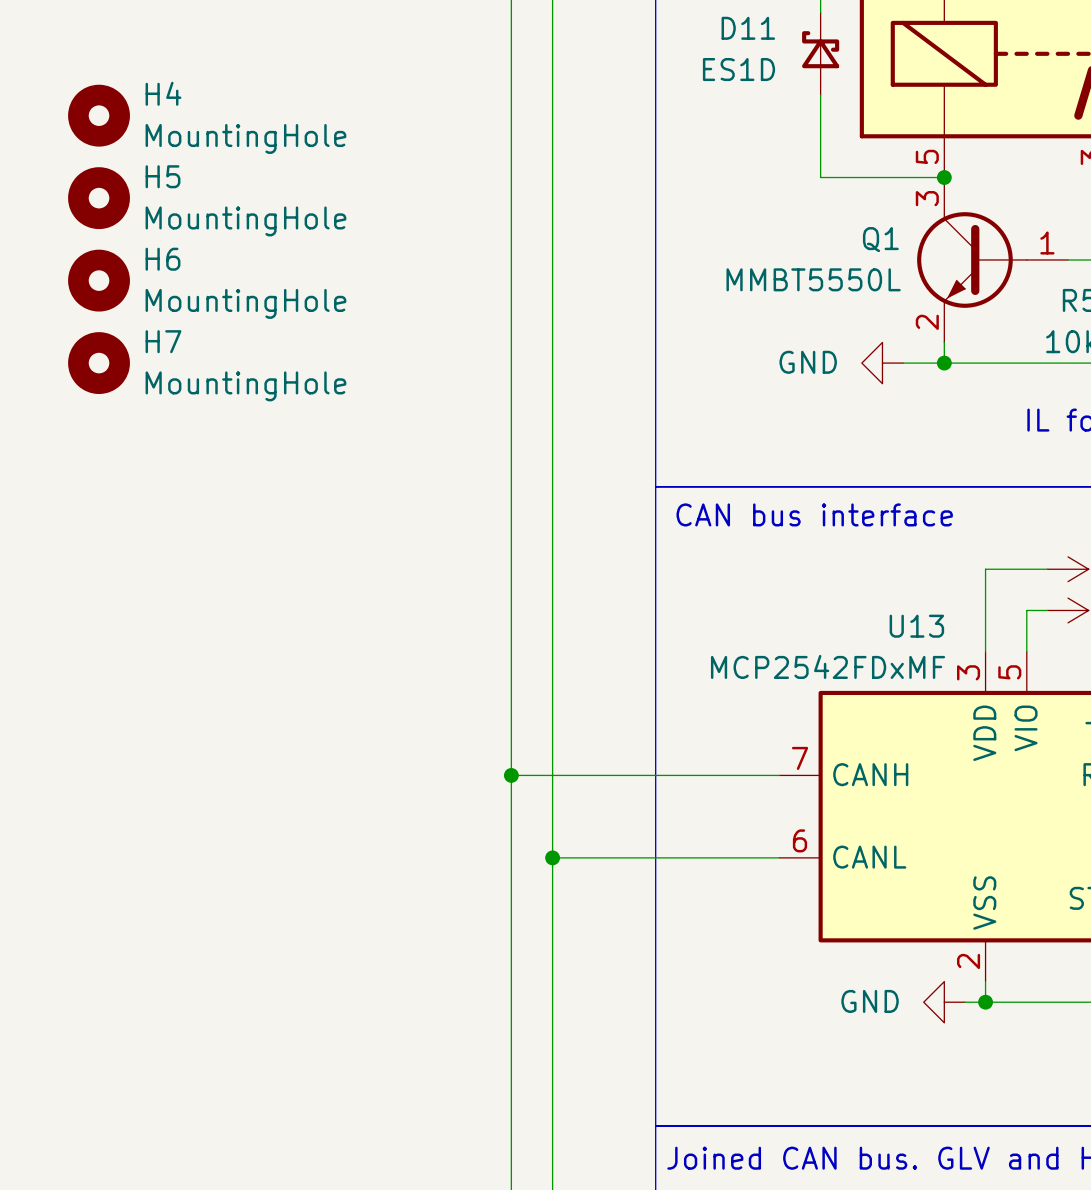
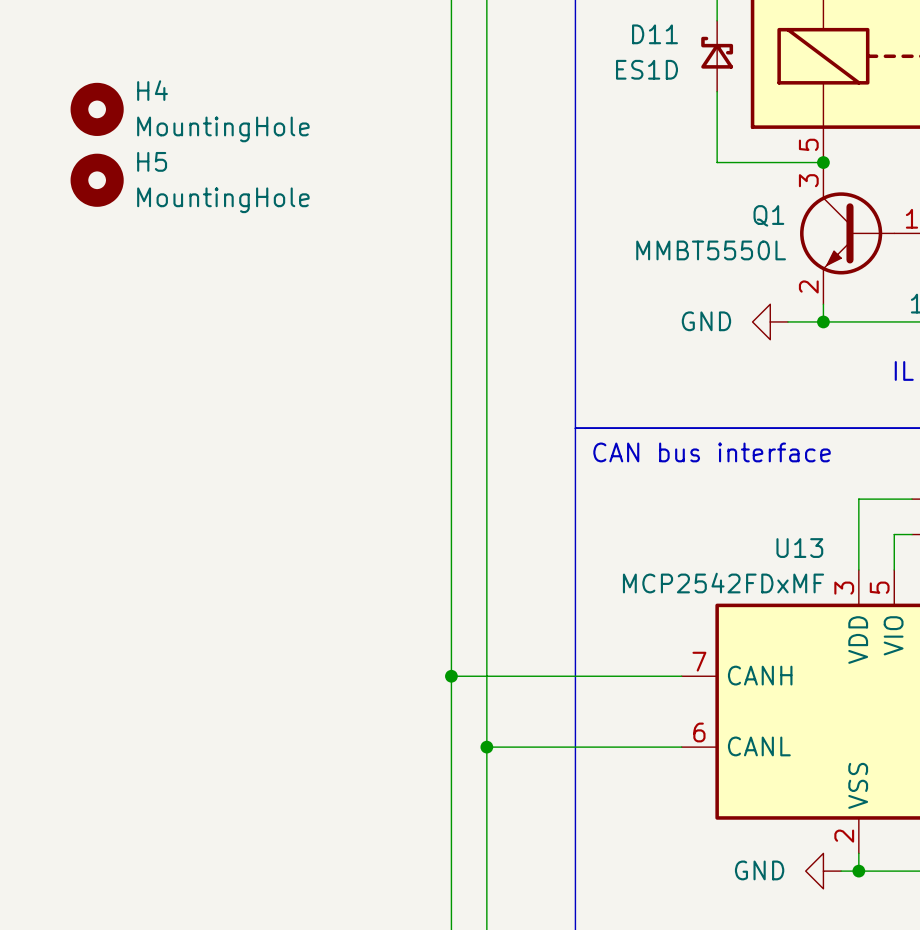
H6: MountingHole (99, 280) -> none
H7: MountingHole (99, 363) -> none

